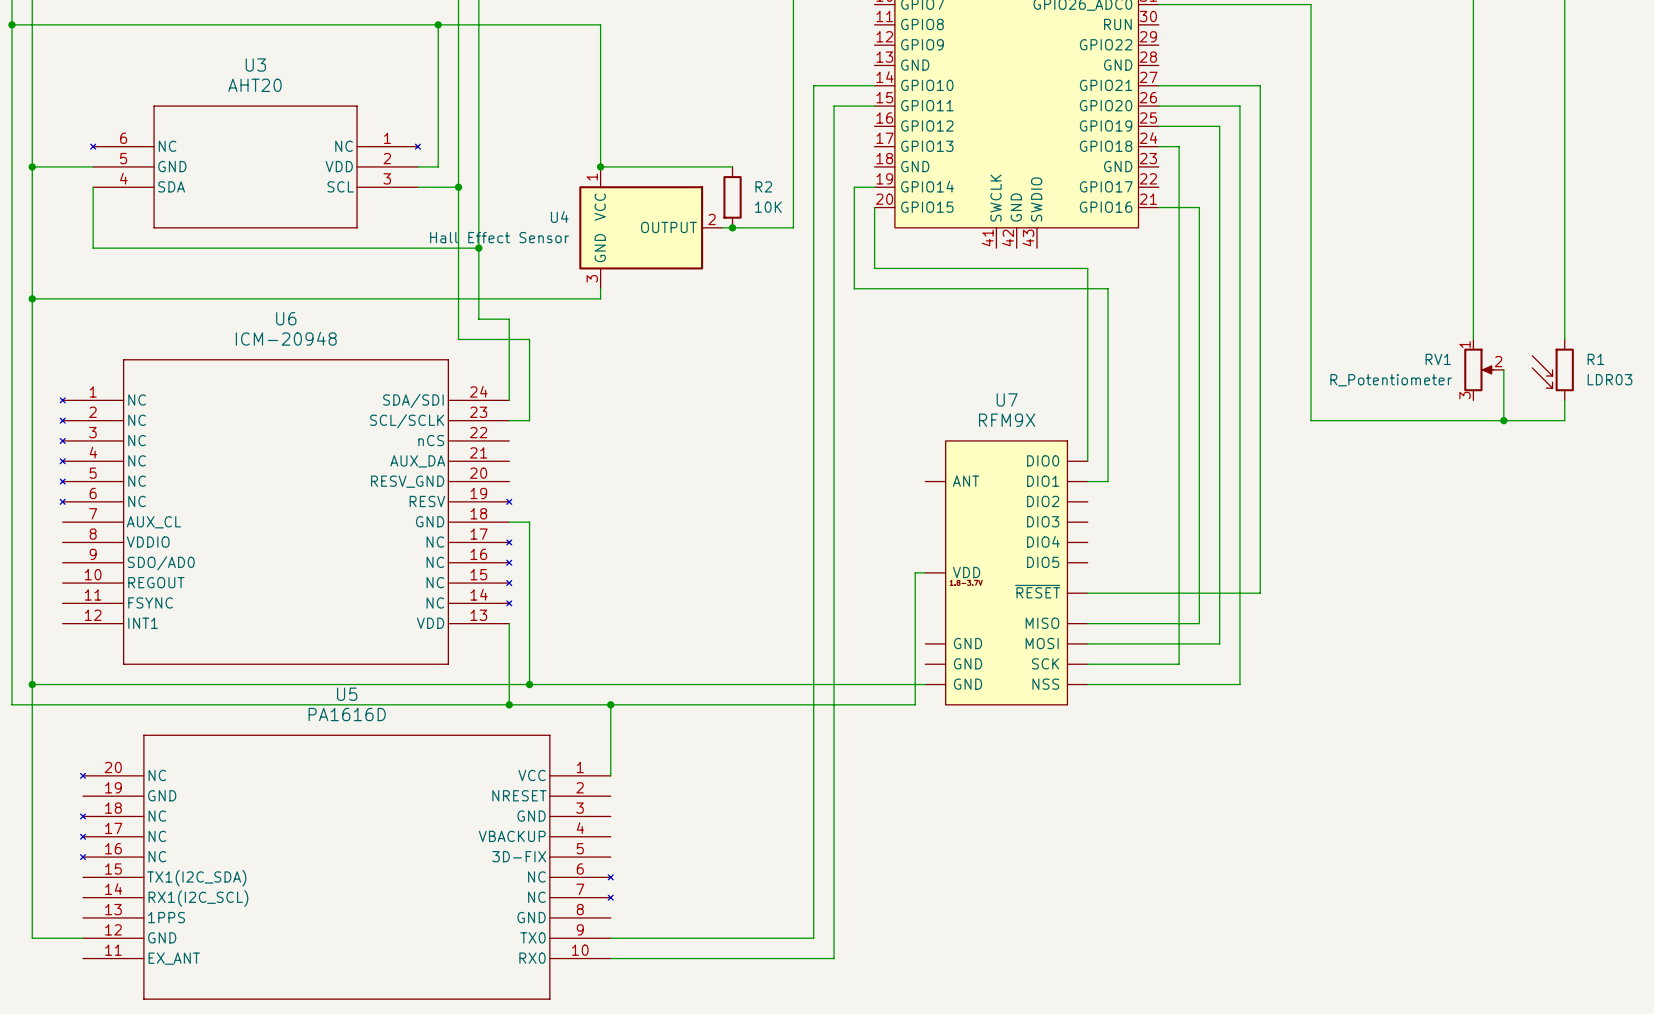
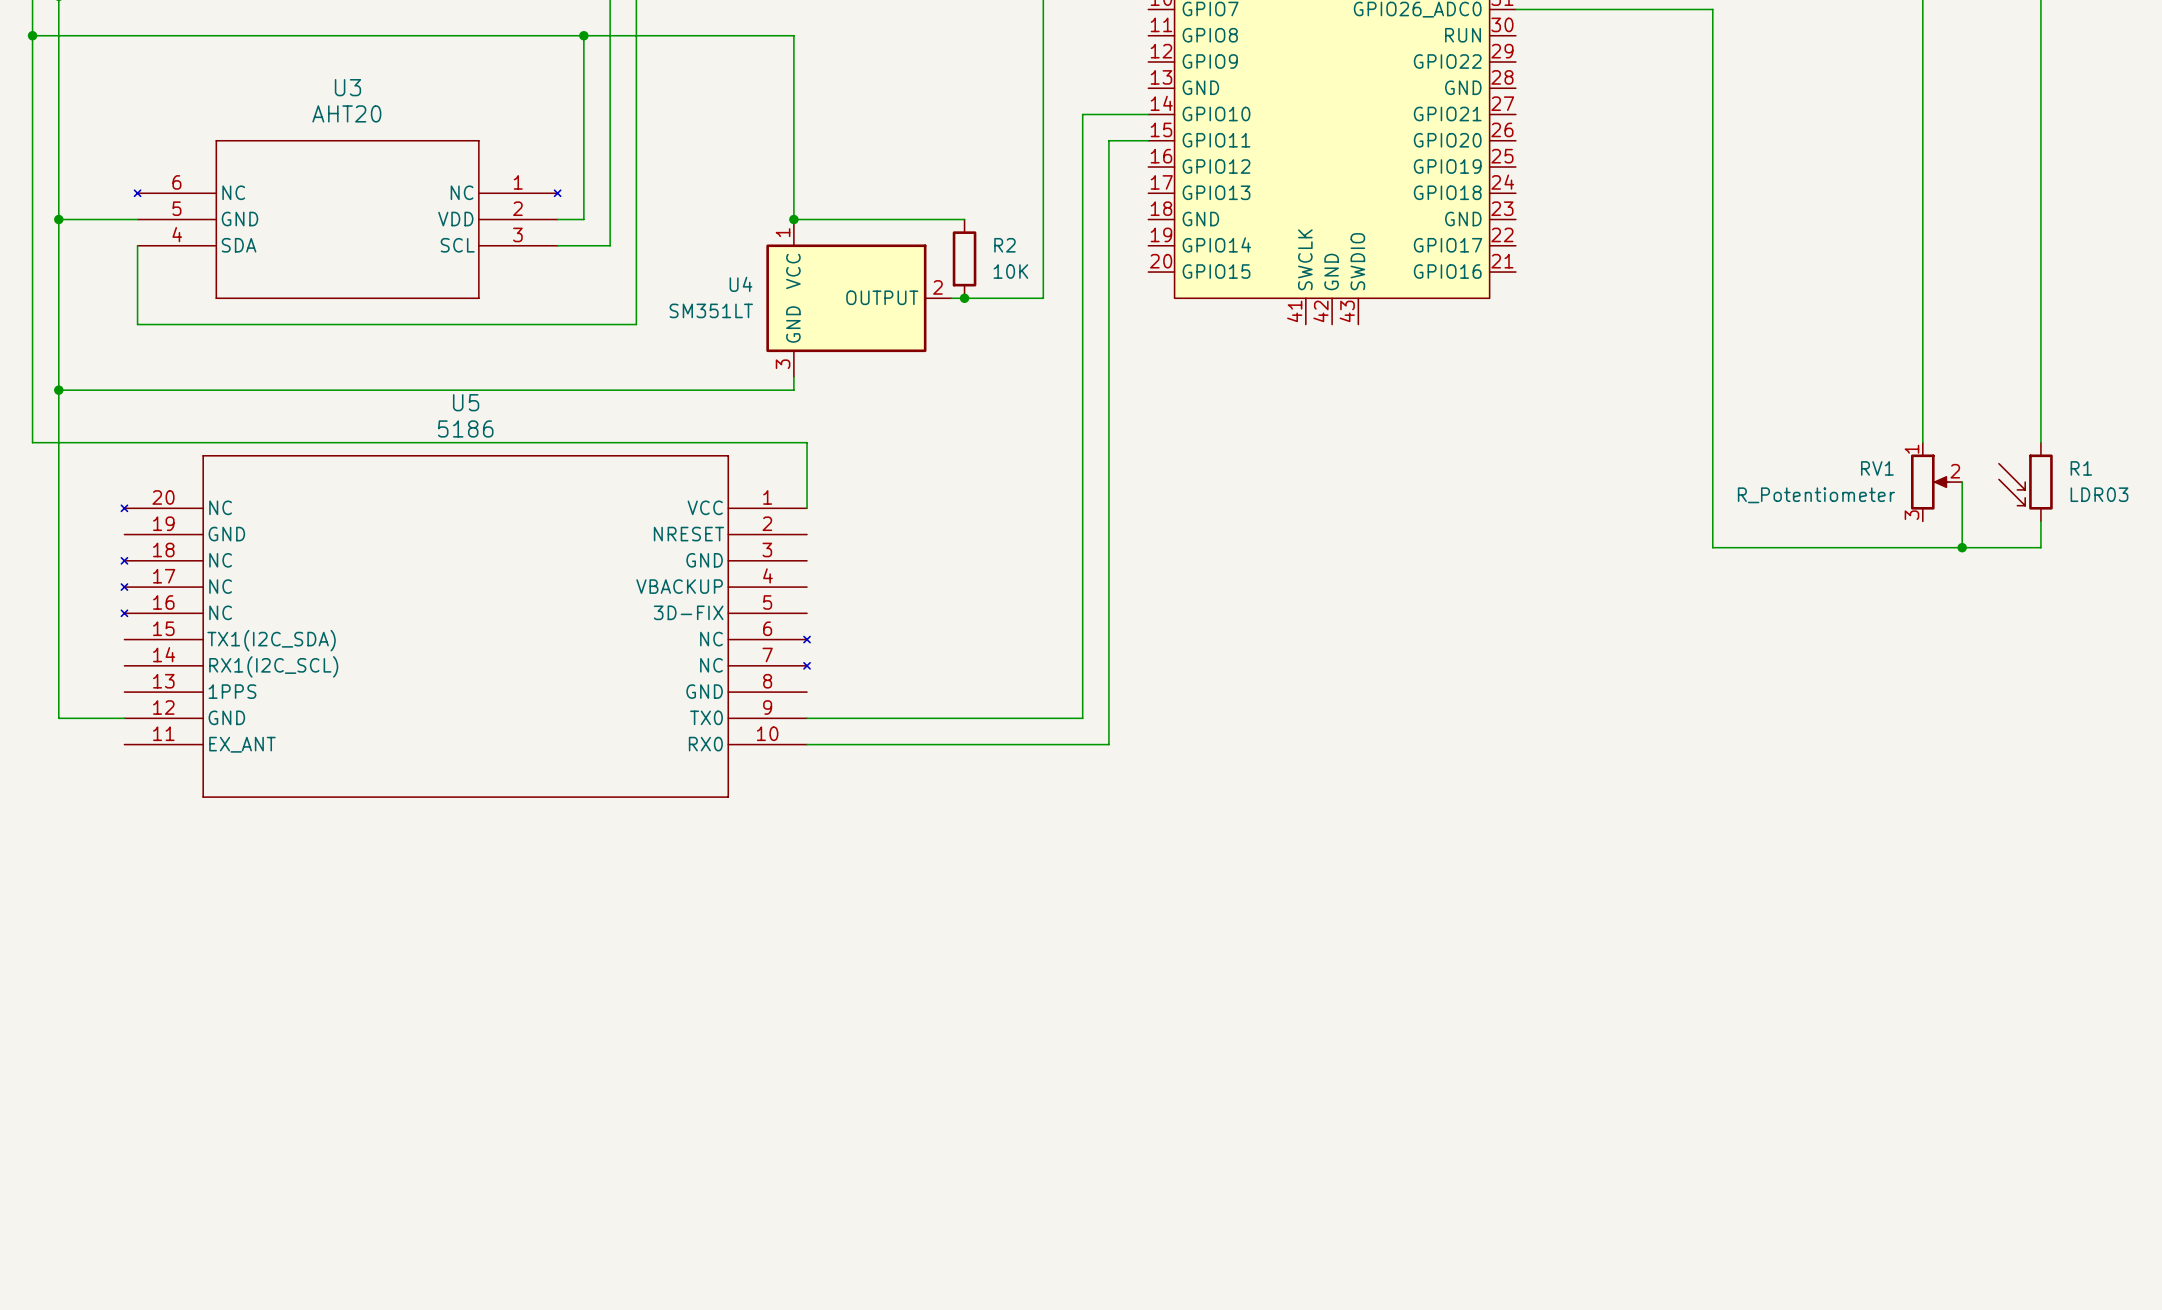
wire: (823, 85) (813, 85) (813, 938) (610, 938) -> (1082, 114) (1082, 718) (807, 718)
wire: (1158, 85) (1260, 85) (1260, 593) (1087, 593) -> none
wire: (844, 106) (834, 106) (834, 958) (610, 958) -> (1108, 140) (1108, 744) (807, 744)
wire: (1158, 106) (1239, 106) (1239, 684) (1087, 684) -> none
wire: (1158, 126) (1219, 126) (1219, 643) (1087, 643) -> none
wire: (1158, 146) (1179, 146) (1179, 664) (1087, 664) -> none
wire: (458, 187) (458, 339) -> (32, 442) (610, 442)
junction: (458, 187) -> none
wire: (874, 187) (854, 187) (854, 288) (1108, 288) (1108, 481) (1087, 481) -> none
wire: (874, 207) (874, 268) (1087, 268) (1087, 461) -> none
wire: (1158, 207) (1199, 207) (1199, 623) (1087, 623) -> none
U4 value: Hall Effect Sensor (499, 237) -> SM351LT (711, 310)
wire: (478, 248) (478, 319) (509, 319) (509, 400) -> none
junction: (478, 248) -> none
wire: (11, 339) (11, 704) (915, 704) (915, 572) (925, 572) -> none
wire: (529, 339) (529, 420) (509, 420) -> (702, 442) (807, 442) (807, 508)
U6: ICM-20948 (285, 512) -> none
wire: (509, 522) (529, 522) (529, 684) -> none
wire: (32, 552) (32, 938) (83, 938) -> (58, 718) (124, 718)
U7: RFM9X (1006, 572) -> none
wire: (509, 623) (509, 704) -> none
wire: (32, 684) (925, 684) -> none
junction: (32, 684) -> none
junction: (529, 684) -> none
junction: (509, 704) -> none
wire: (610, 704) (610, 775) -> none
junction: (610, 704) -> none
U5 value: PA1616D (347, 714) -> 5186 (465, 428)
U5 position: (346, 867) -> (465, 626)

